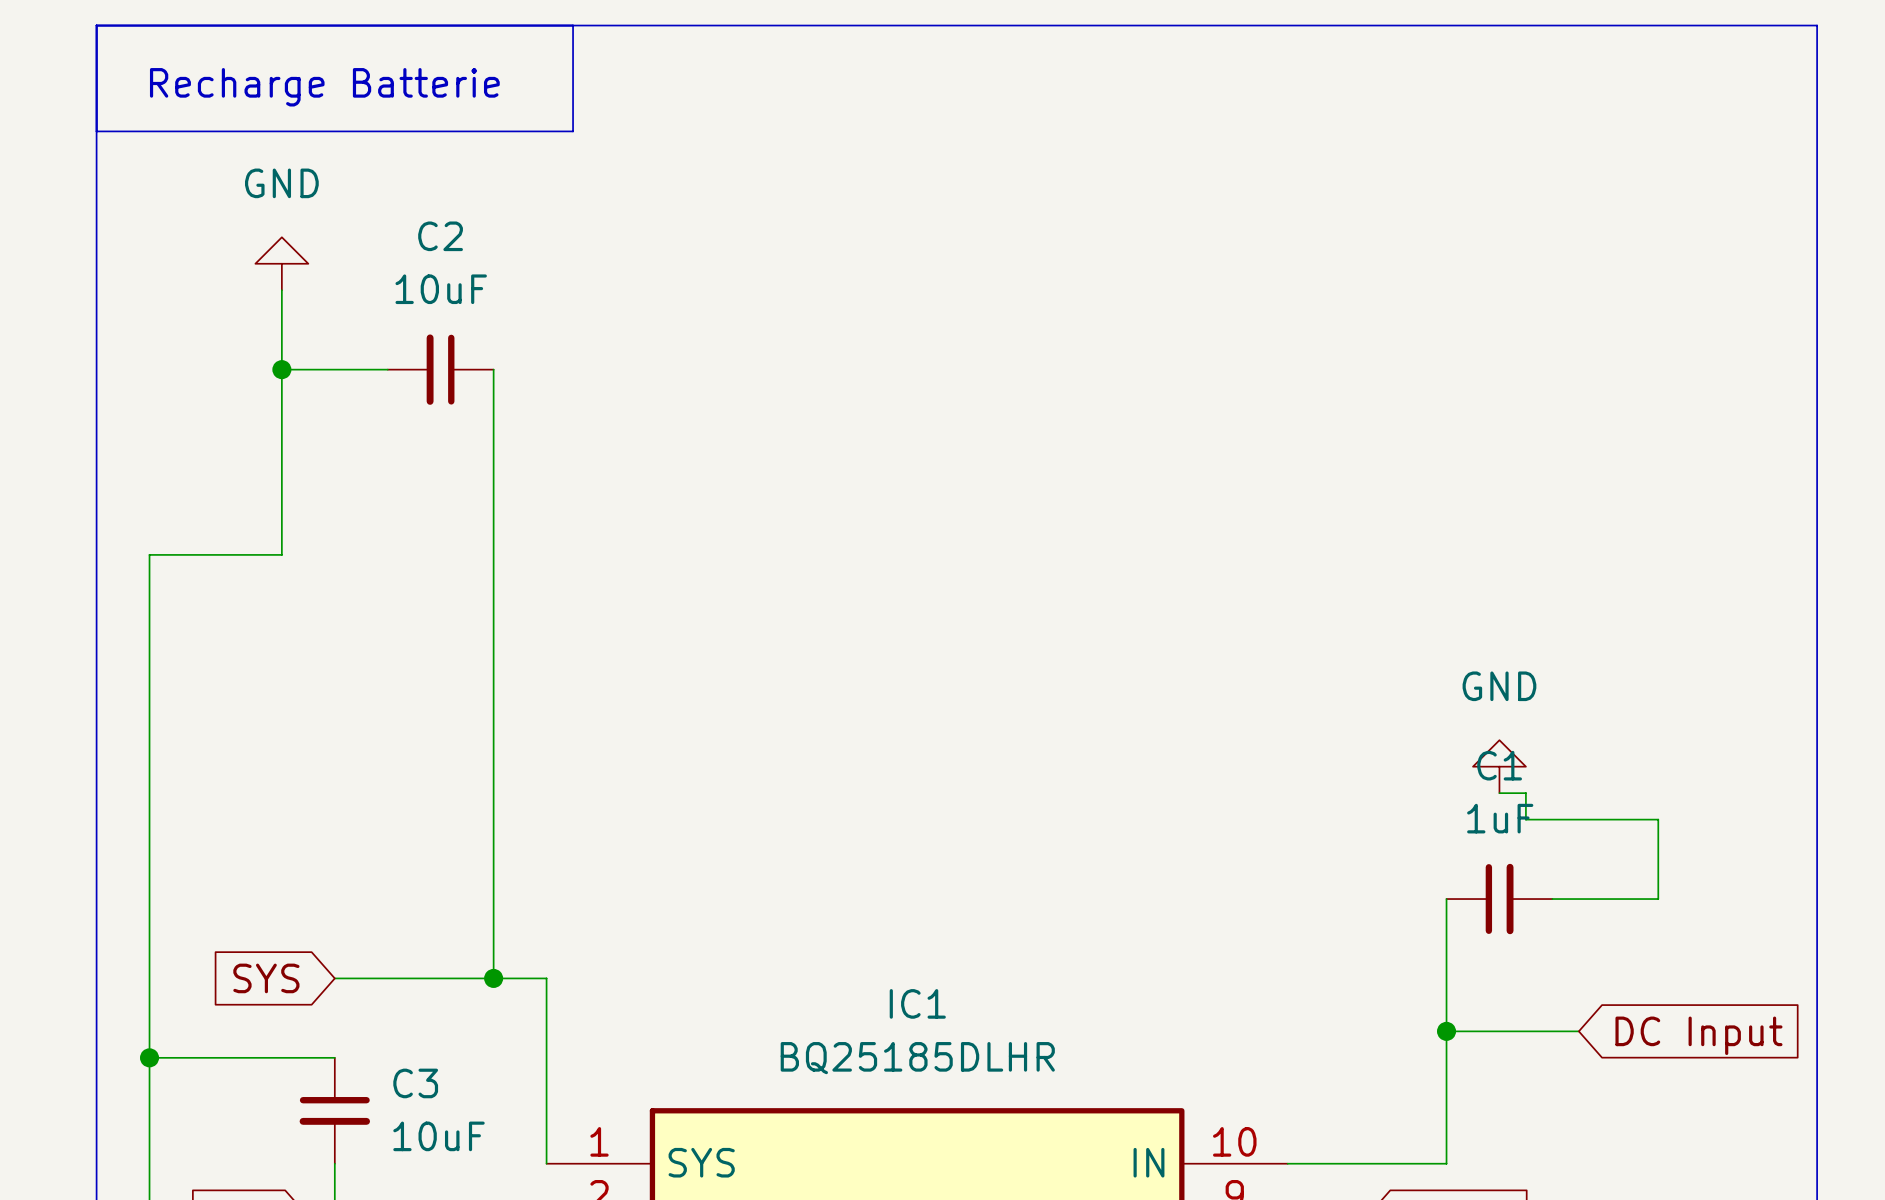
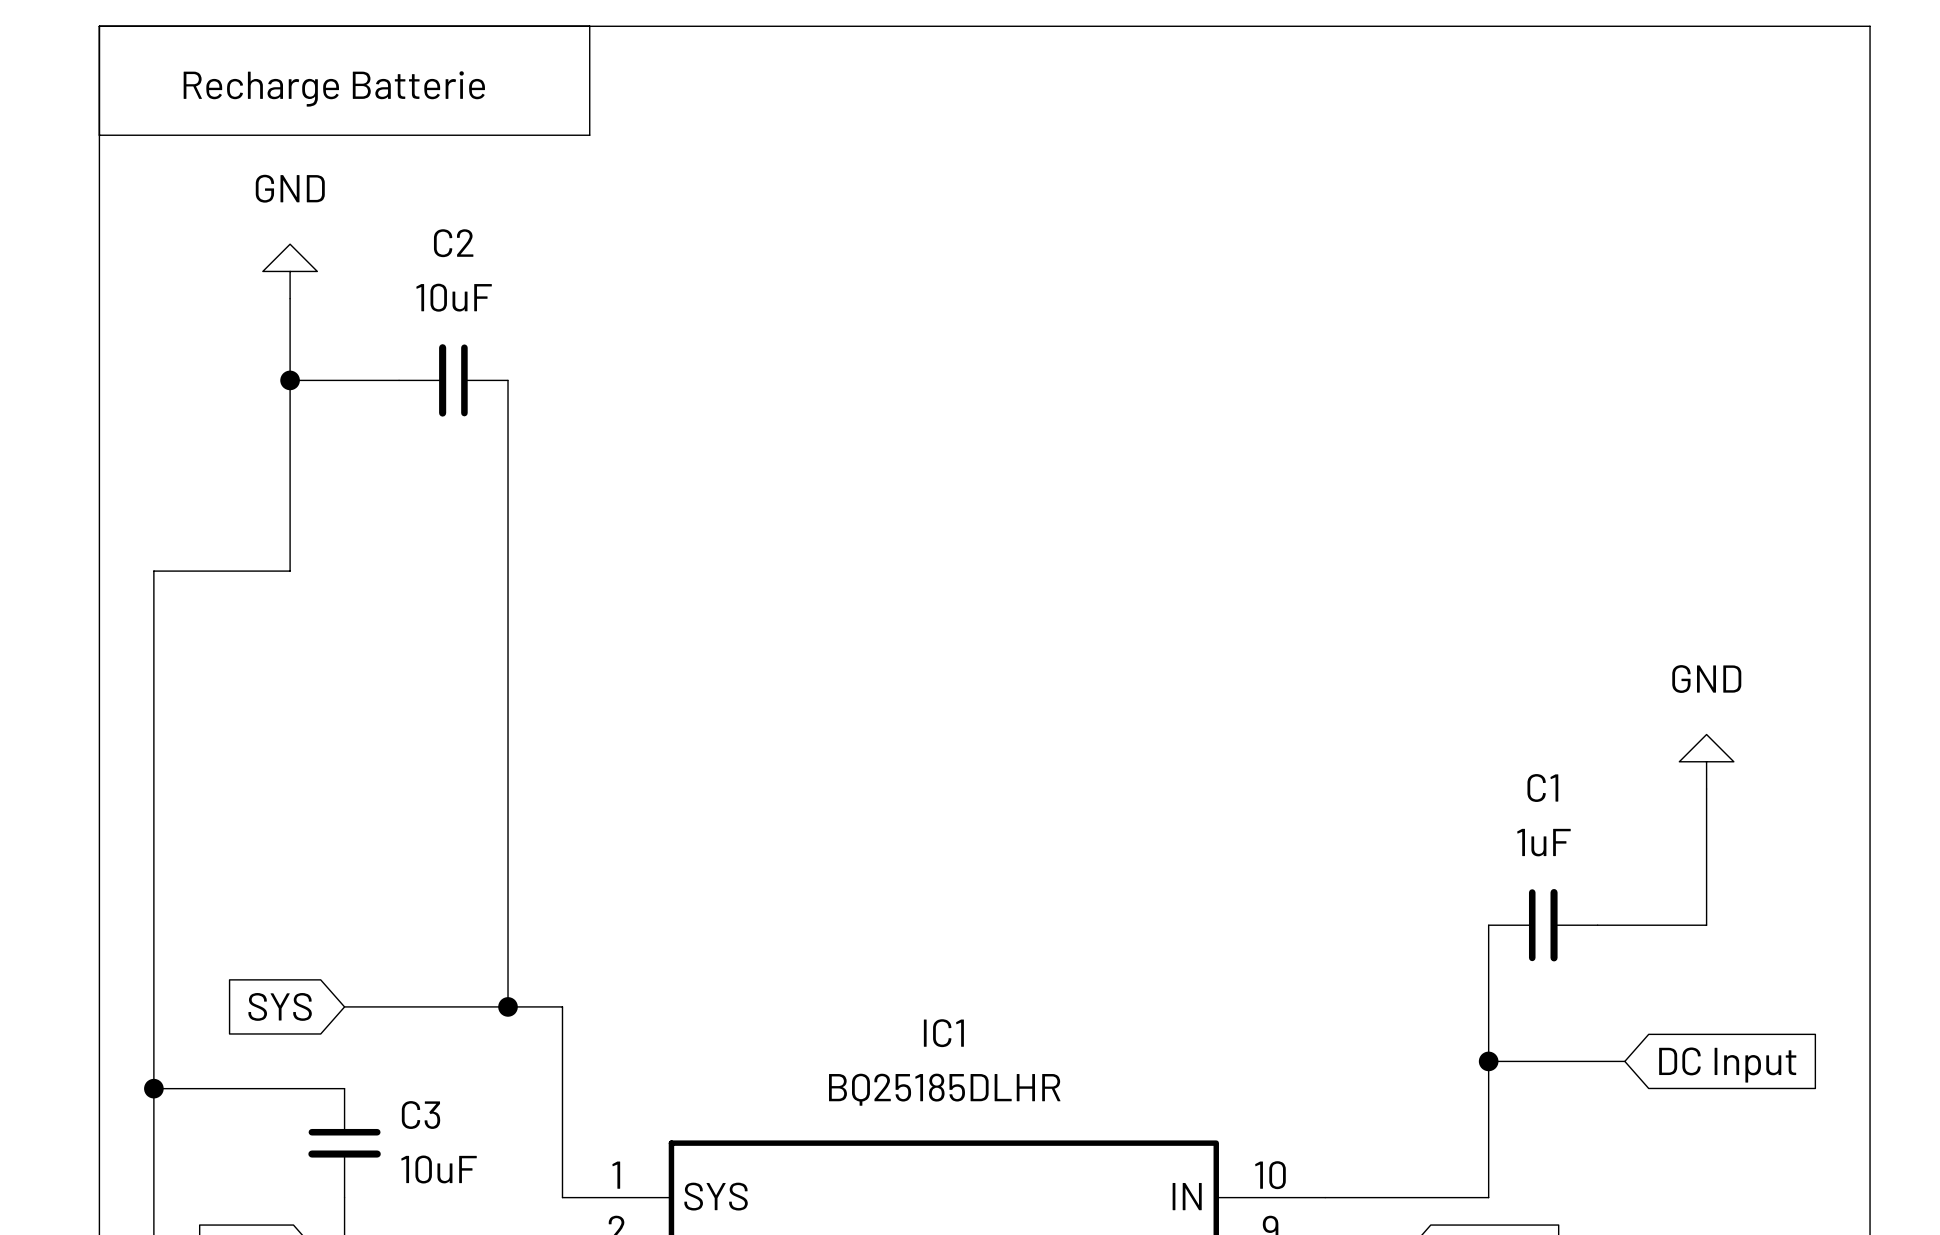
power symbol position: GND (1499, 766) -> GND (1706, 761)
wire: (1499, 793) (1525, 793) (1525, 819) (1658, 819) -> (1706, 789) (1706, 843)

